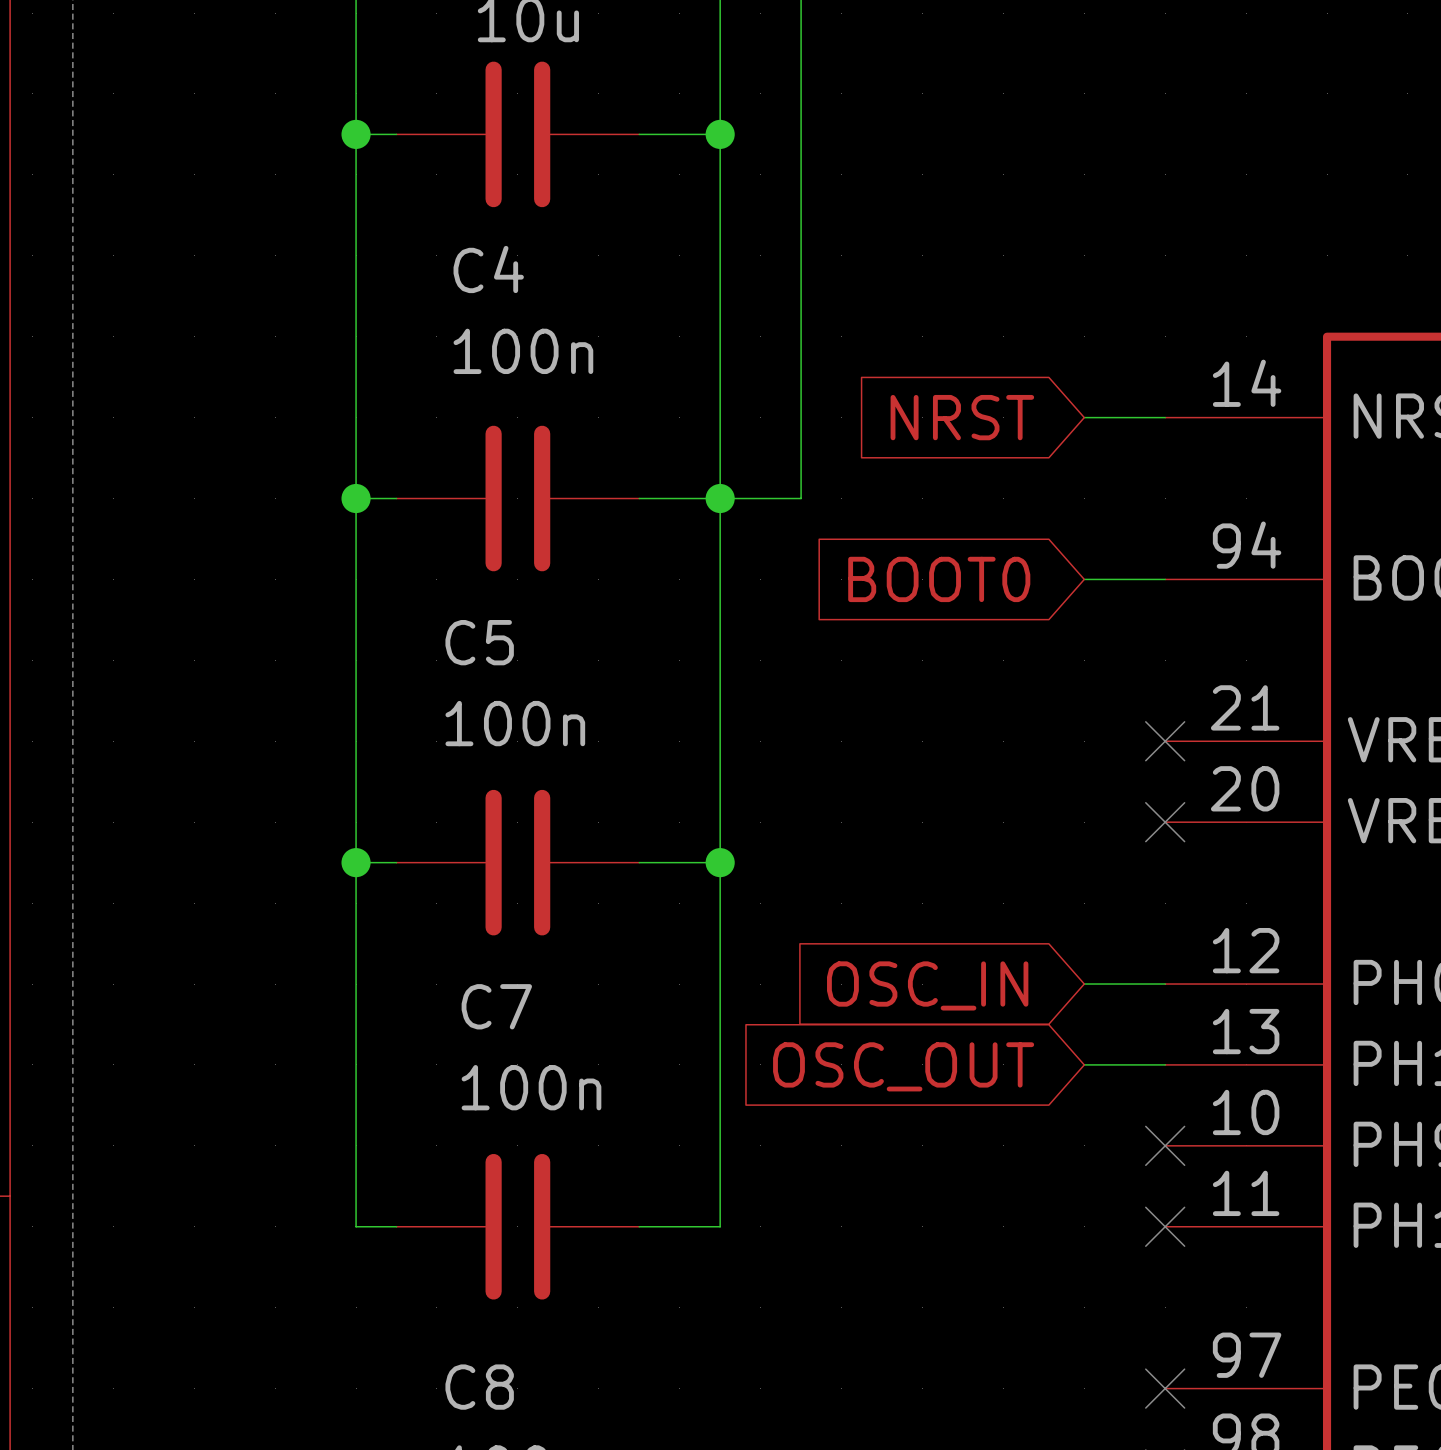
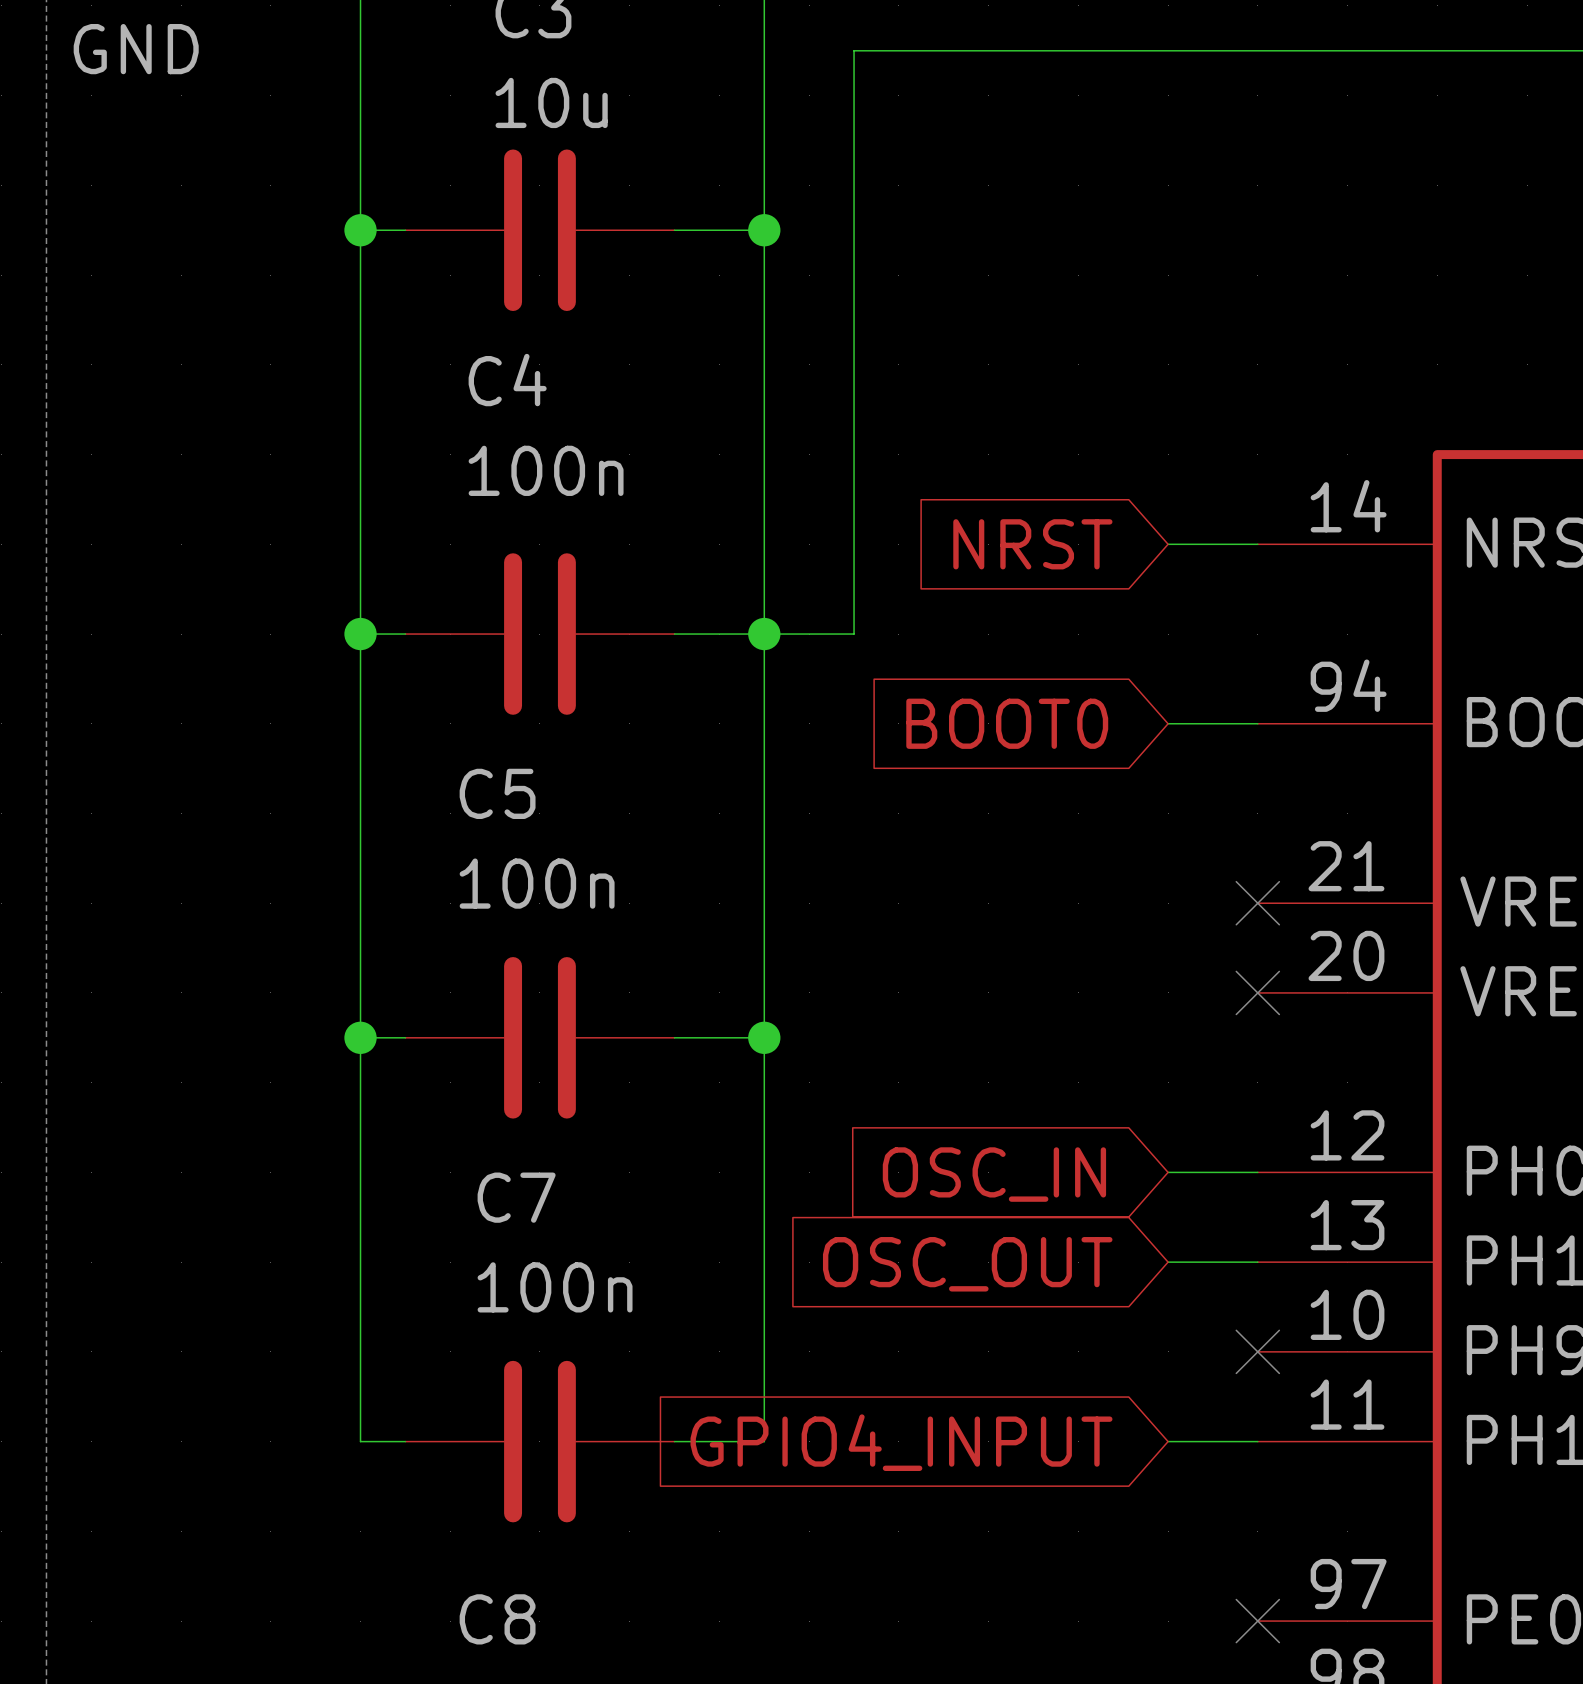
wire: none -> (1168, 1441) (1257, 1441)
no-connect mark: (1165, 1226) -> none
global label: none -> GPIO4_INPUT (901, 1442)

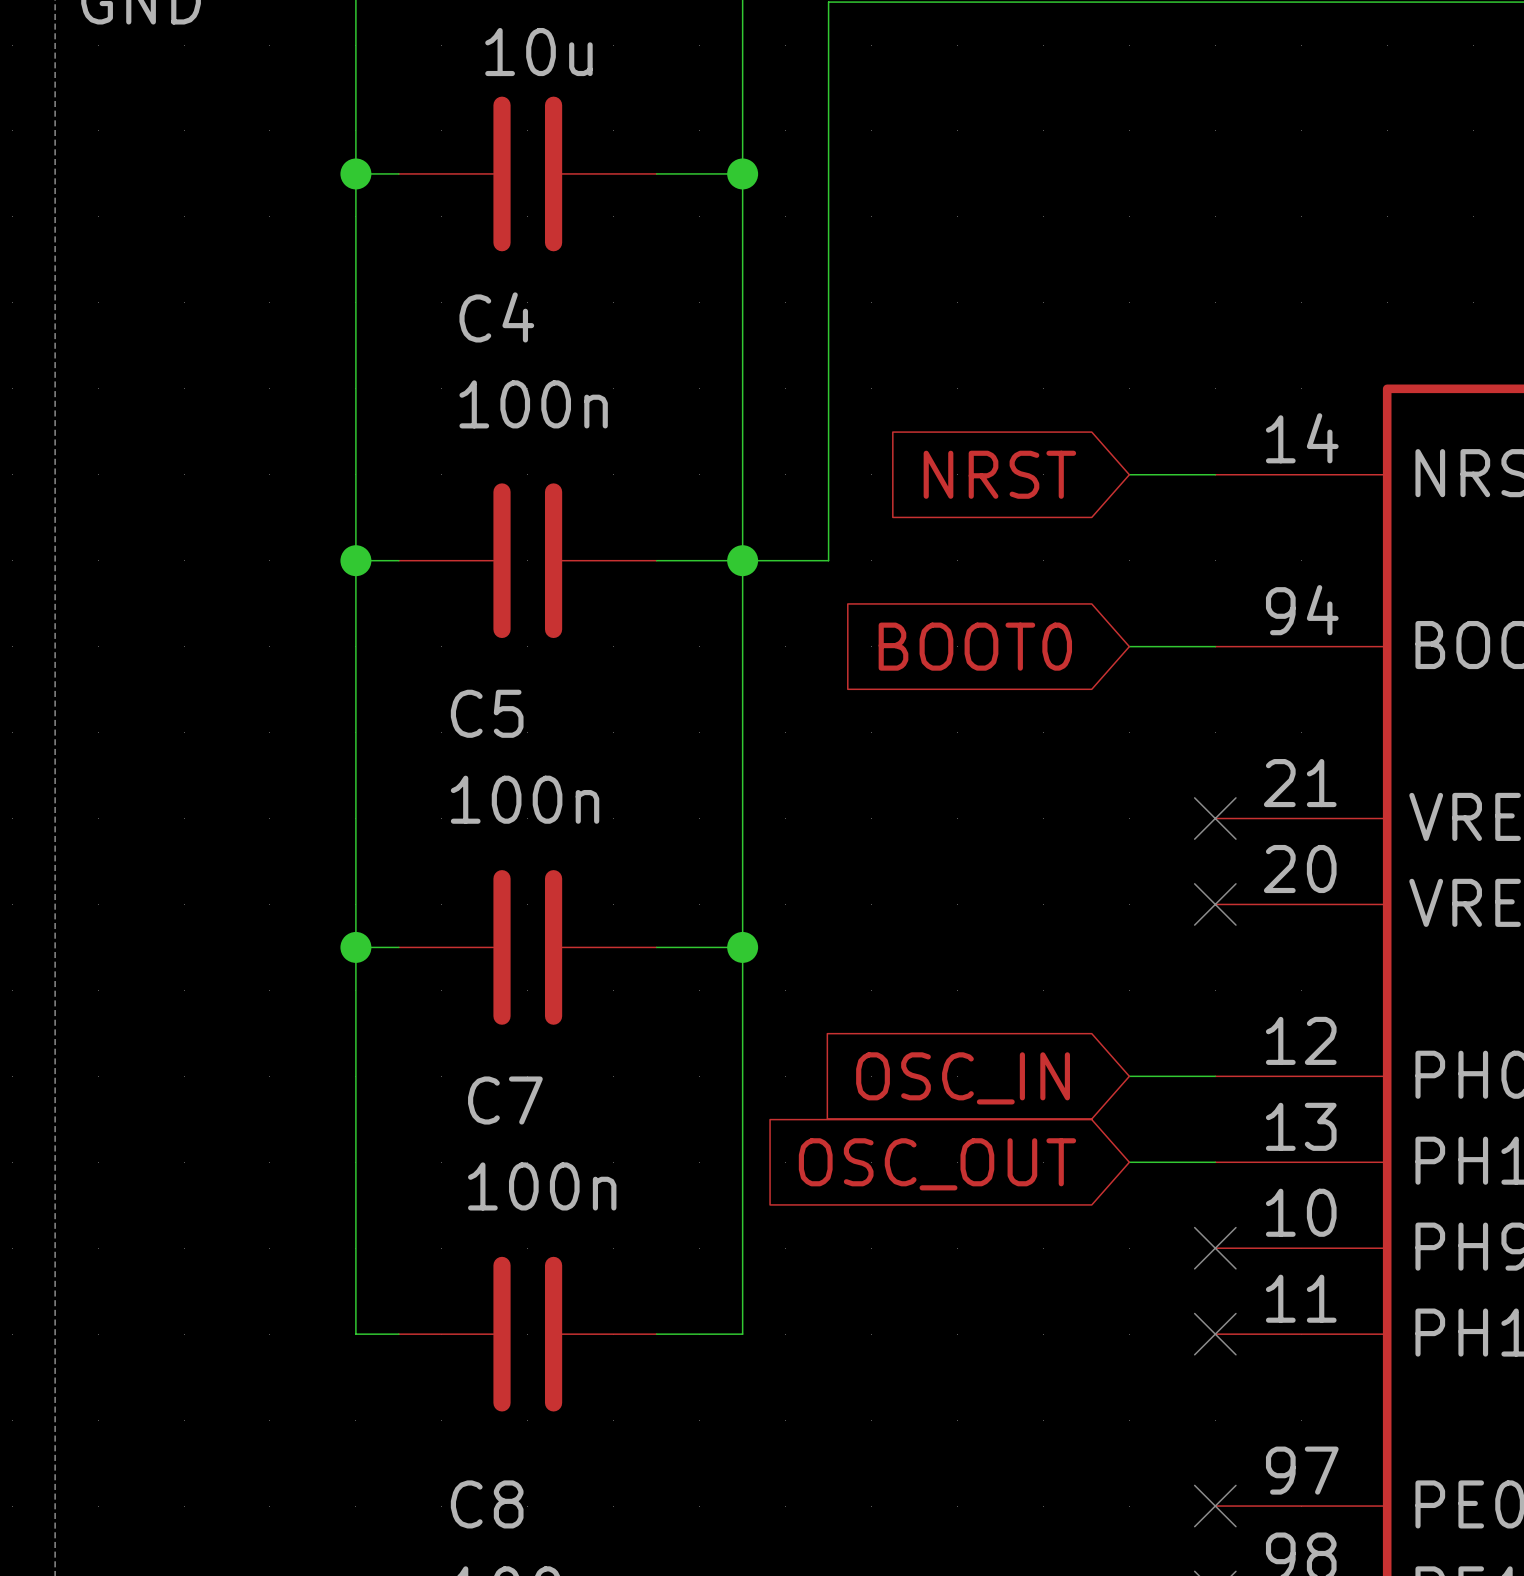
wire: (1168, 1441) (1257, 1441) -> none
no-connect mark: none -> (1215, 1334)
global label: GPIO4_INPUT (901, 1442) -> none

